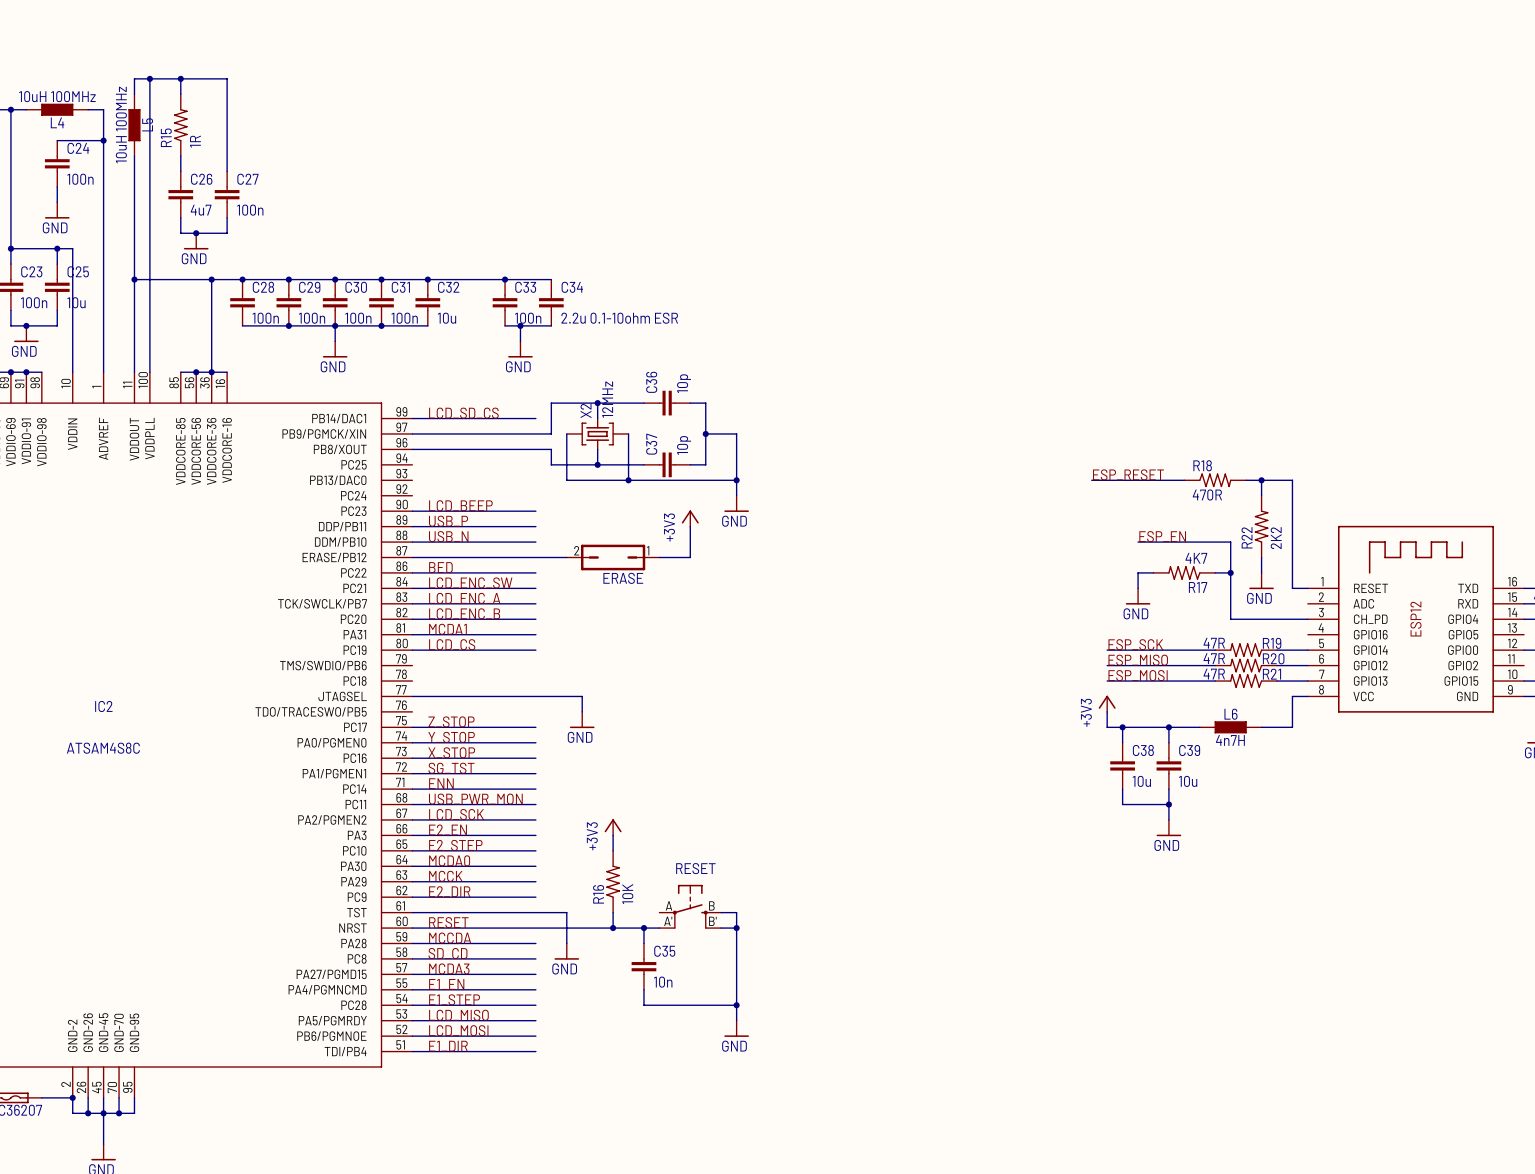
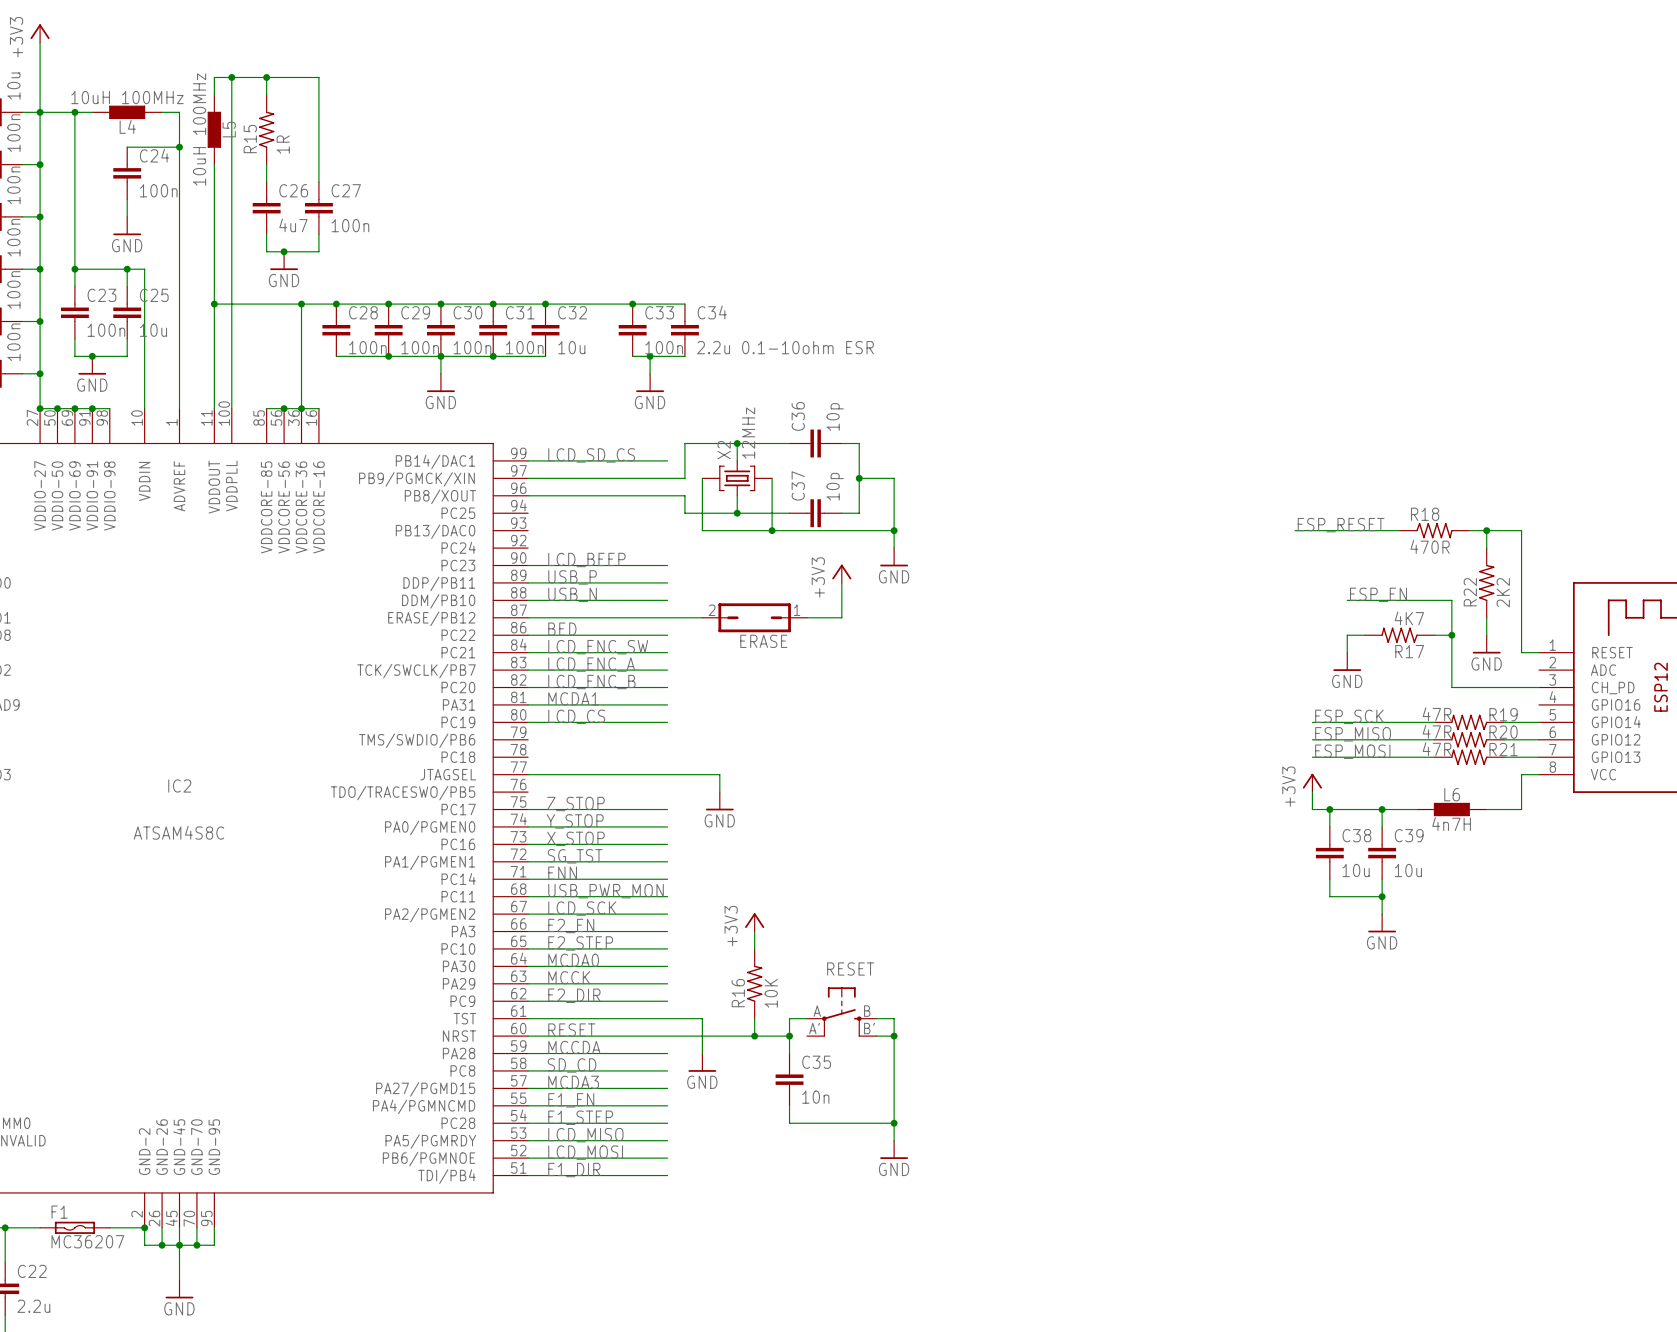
wire: (643, 928) (659, 928) -> (789, 1036) (789, 1018) (806, 1018)

